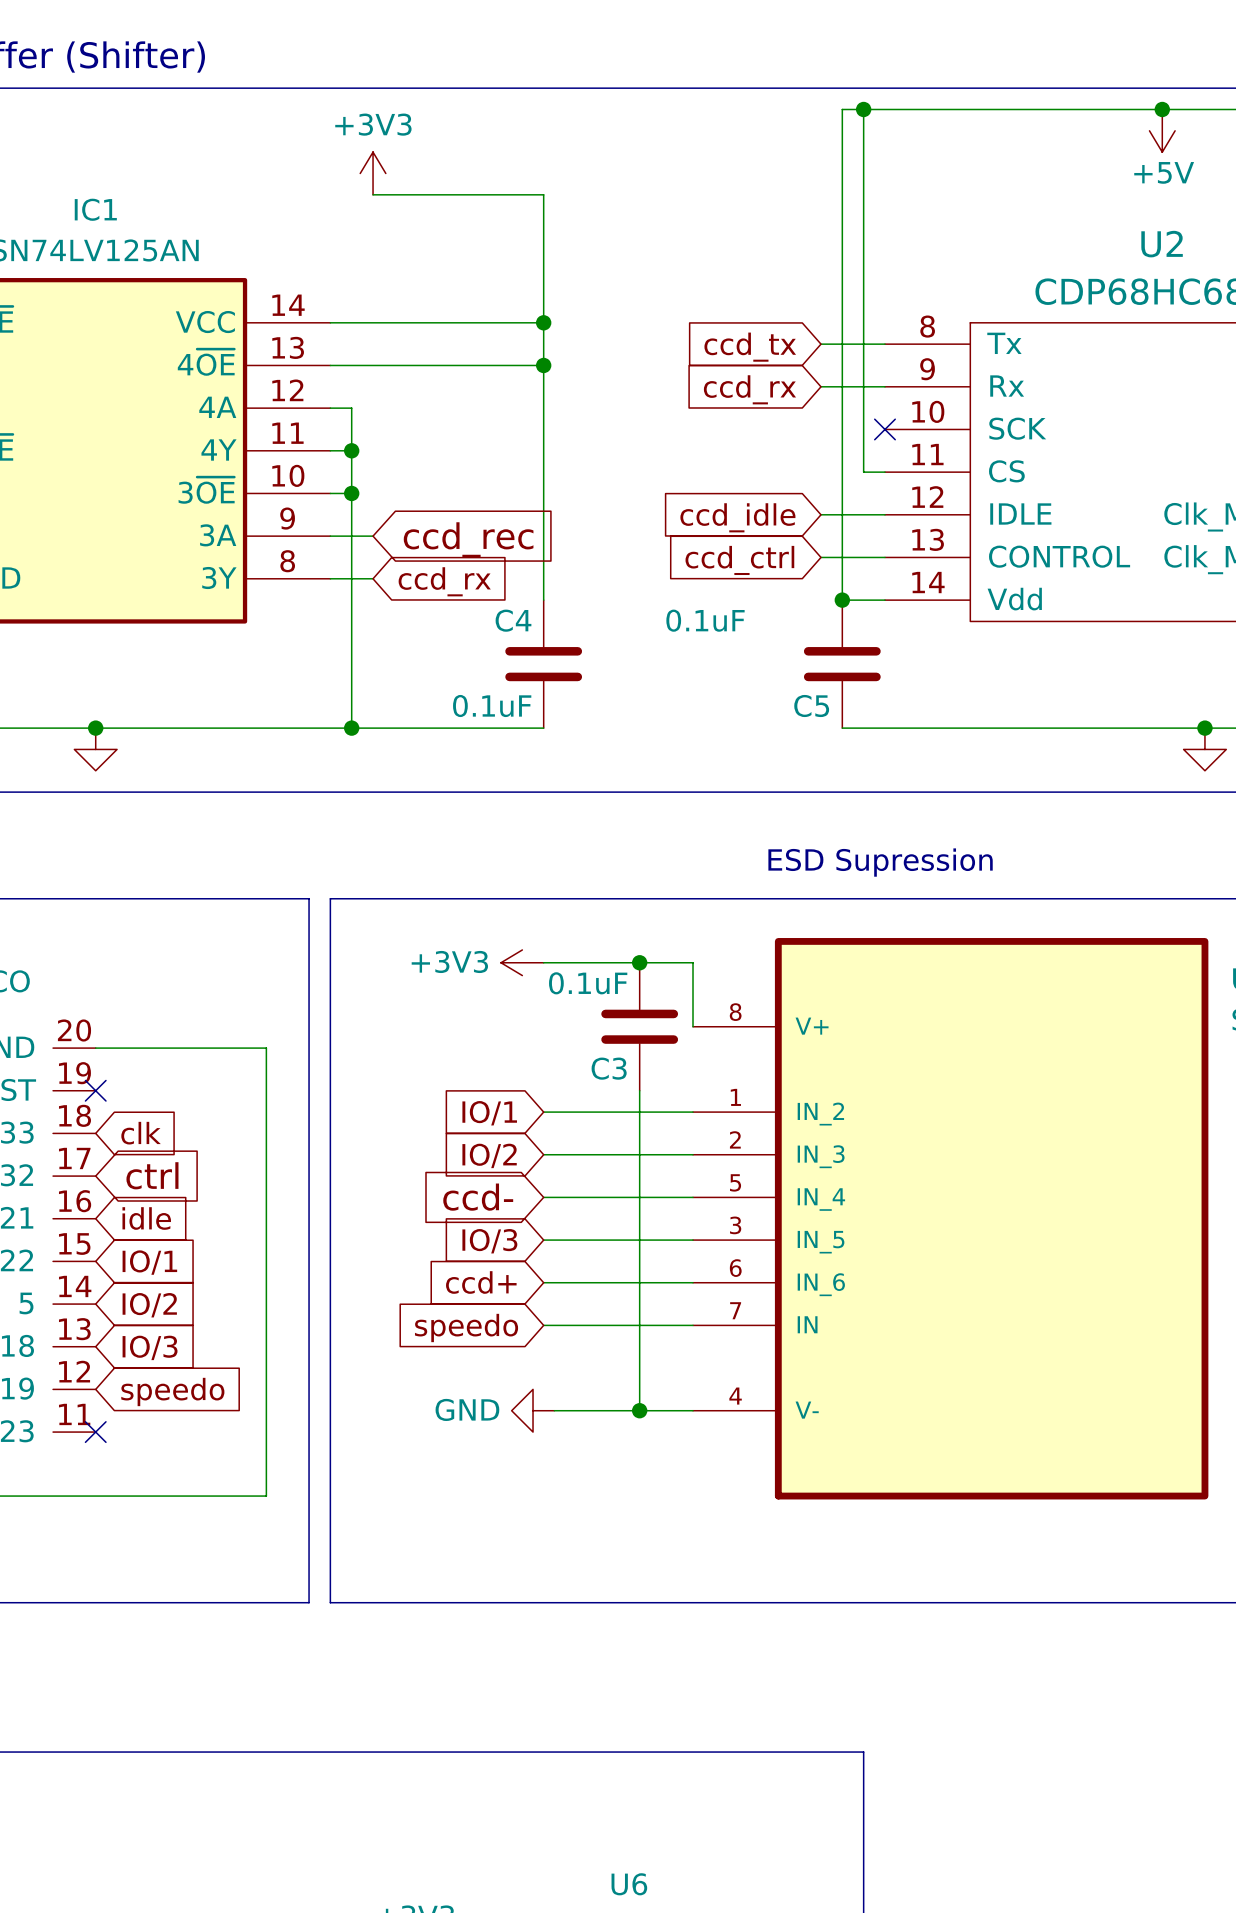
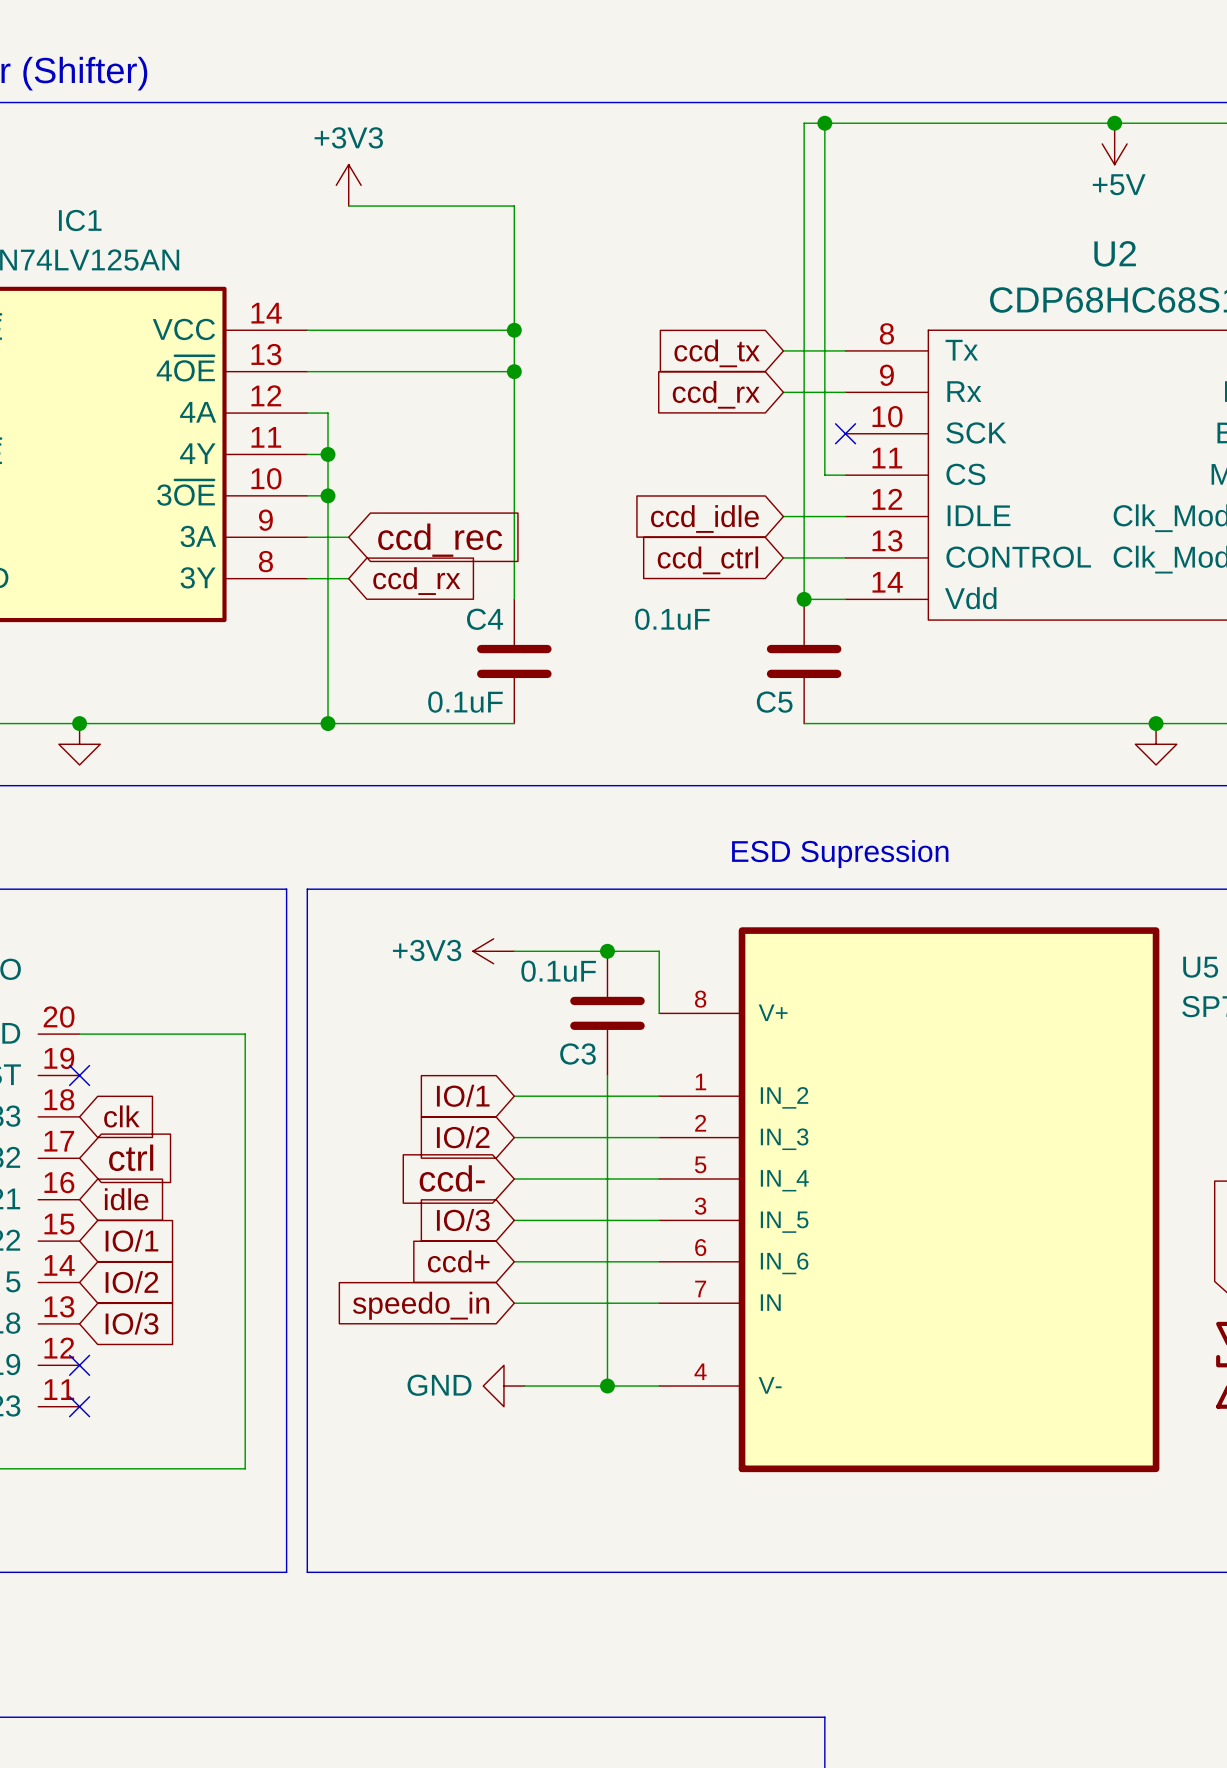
global label: speedo (466, 1327) -> speedo_in (421, 1305)
no-connect mark: none -> (79, 1365)
global label: speedo (172, 1391) -> none

